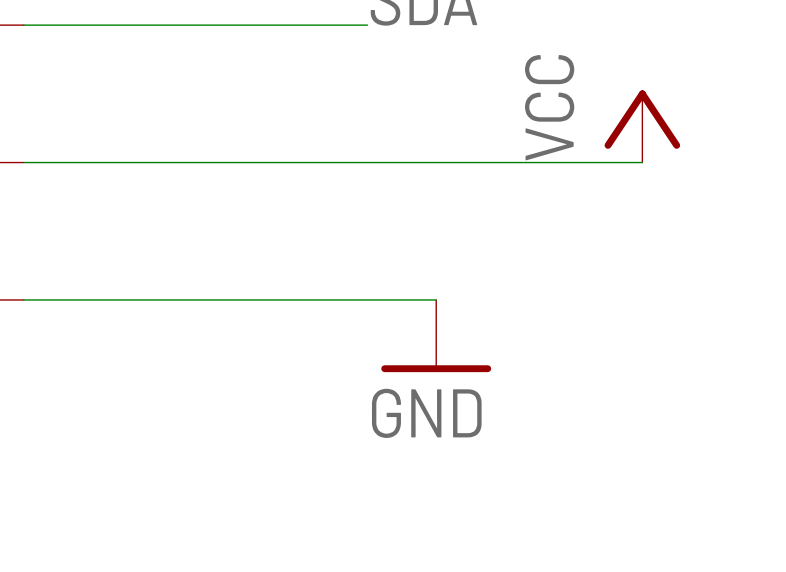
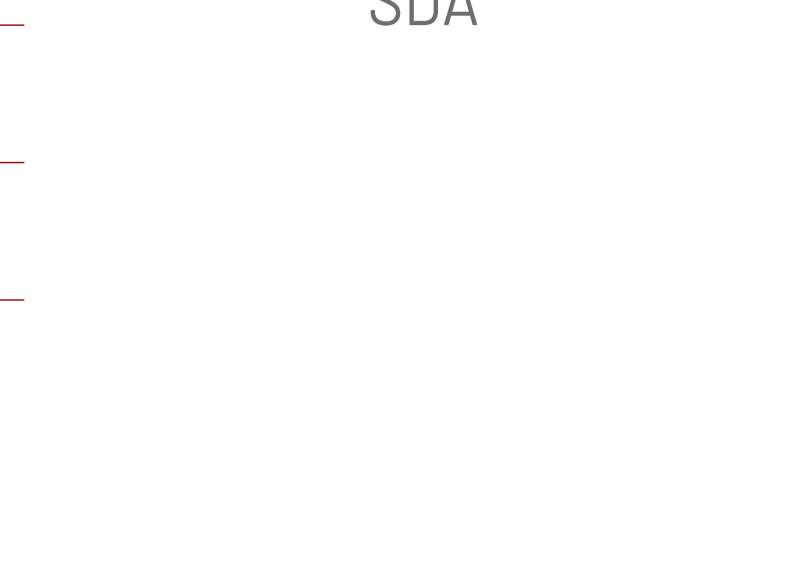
wire: (23, 25) (367, 25) -> none
power symbol: VCC (642, 126) -> none
wire: (23, 162) (642, 162) -> none
wire: (23, 299) (436, 299) -> none
power symbol: GND (436, 336) -> none

